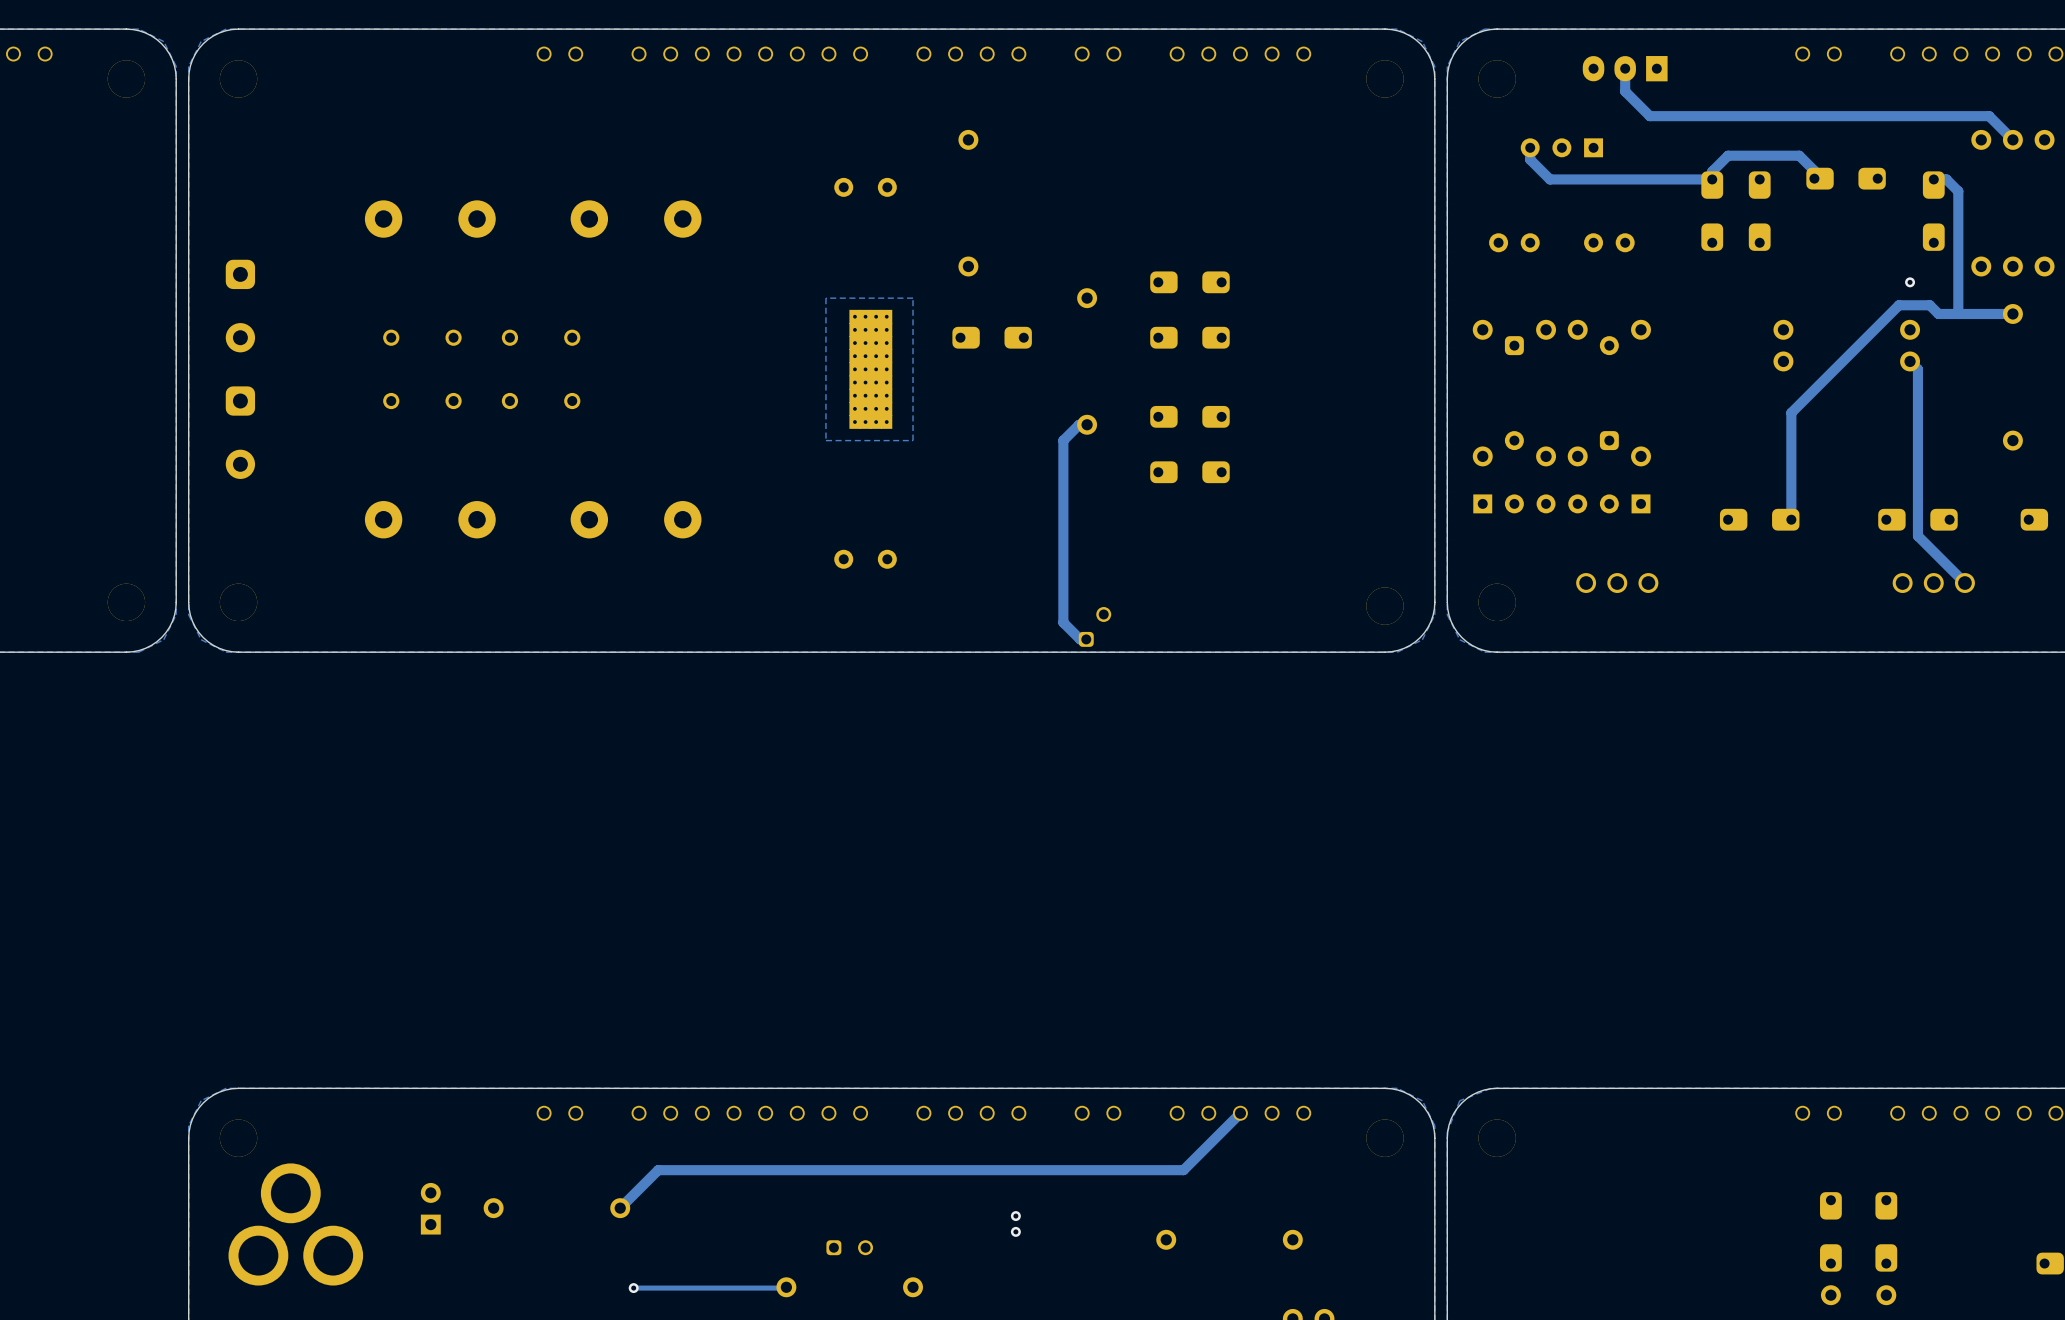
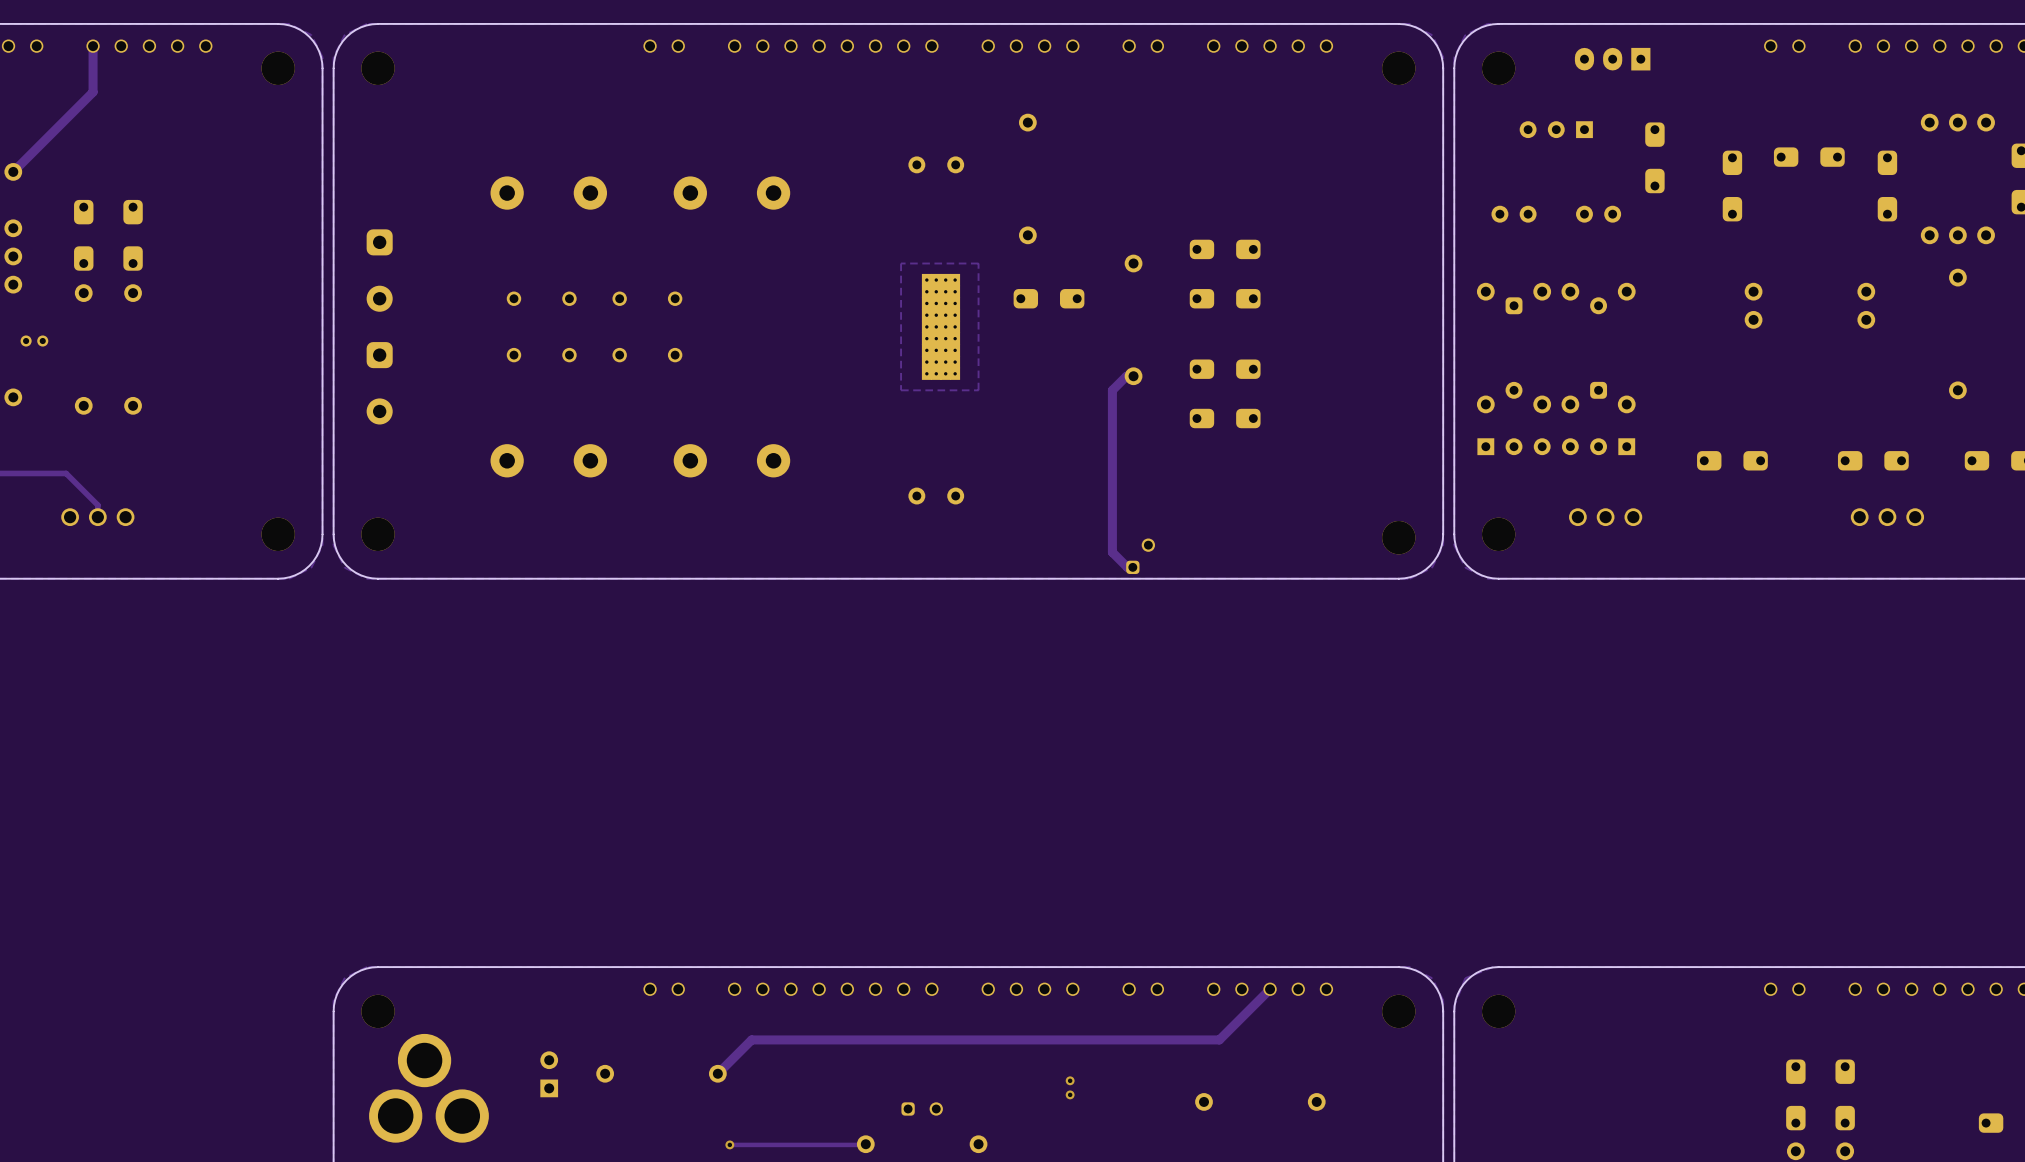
track: (1625, 68) (1625, 91) (1649, 116) (1989, 116) (2012, 139) -> none
track: (1530, 147) (1530, 159) (1550, 179) (1712, 179) (1712, 171) (1728, 155) (1799, 155) (1814, 170) (1814, 178) -> none
track: (1933, 179) (1946, 179) (1958, 191) (1958, 312) (1959, 313) -> none
part position: (1712, 211) -> (1654, 157)
via: (1910, 282) -> none
track: (2012, 313) (1938, 313) (1929, 305) (1898, 305) (1791, 412) (1791, 519) -> none
track: (1910, 361) (1917, 369) (1917, 536) (1964, 583) -> none

